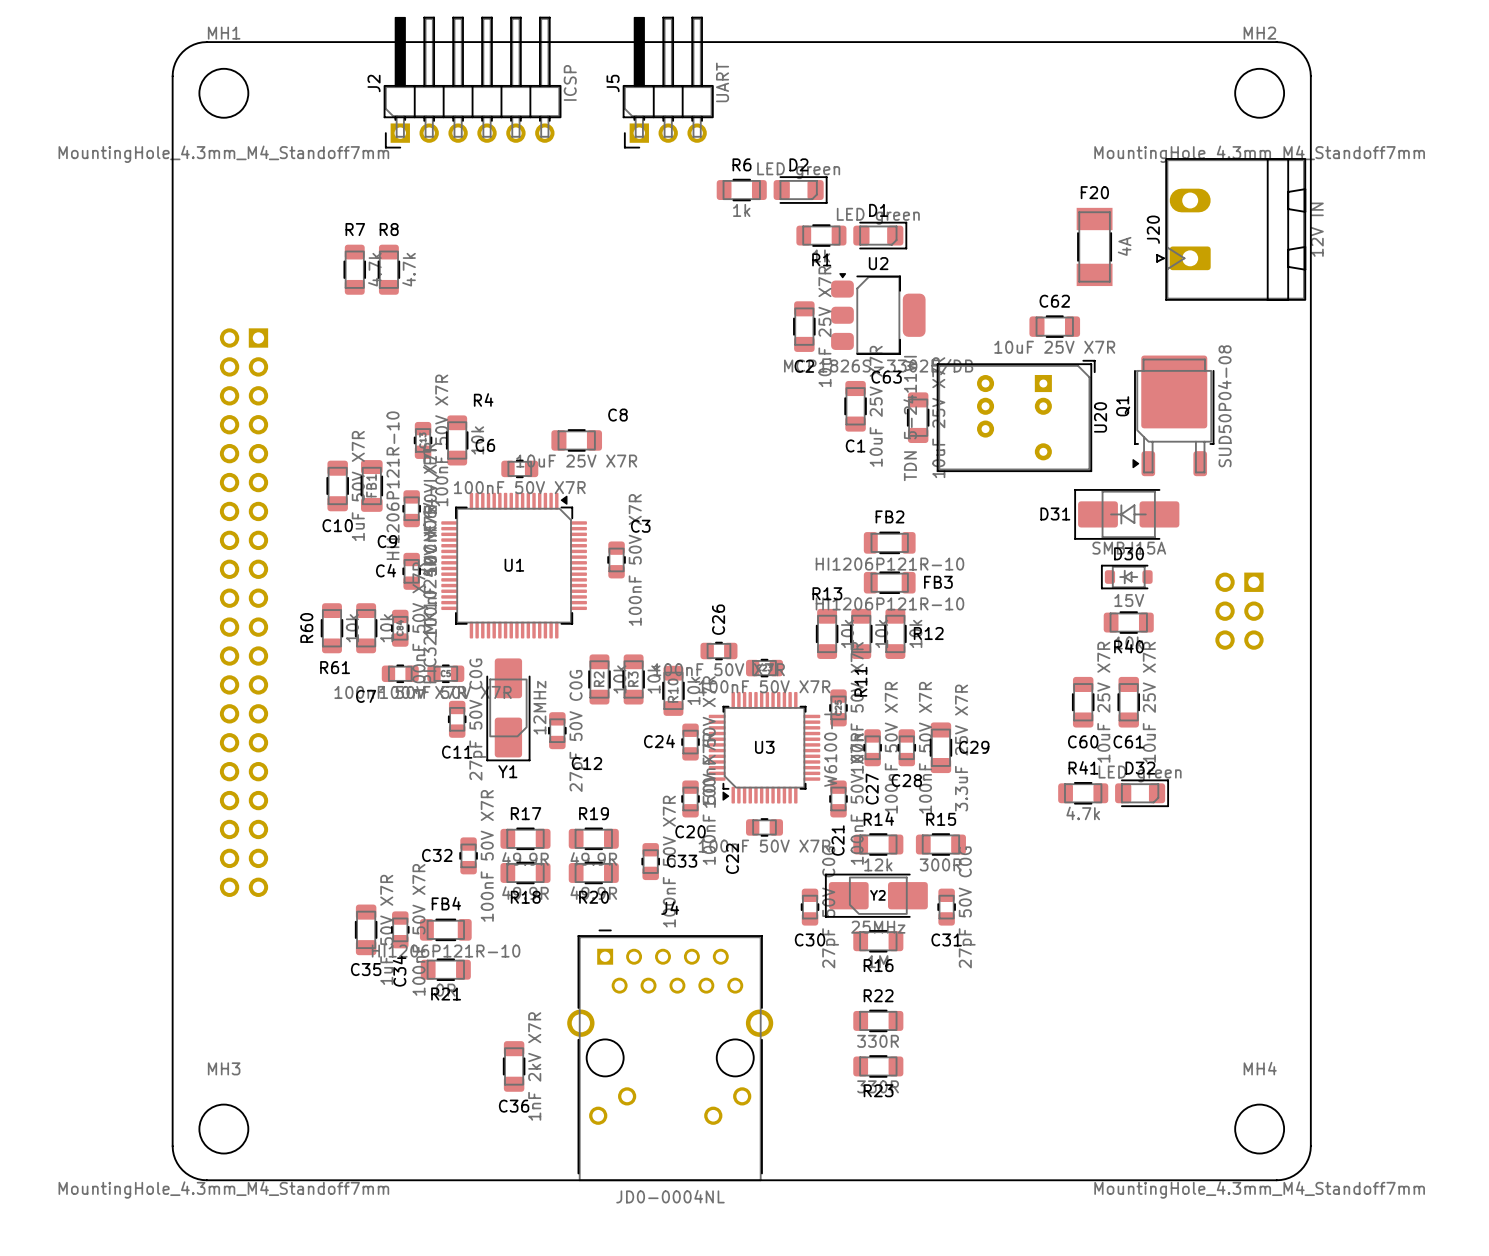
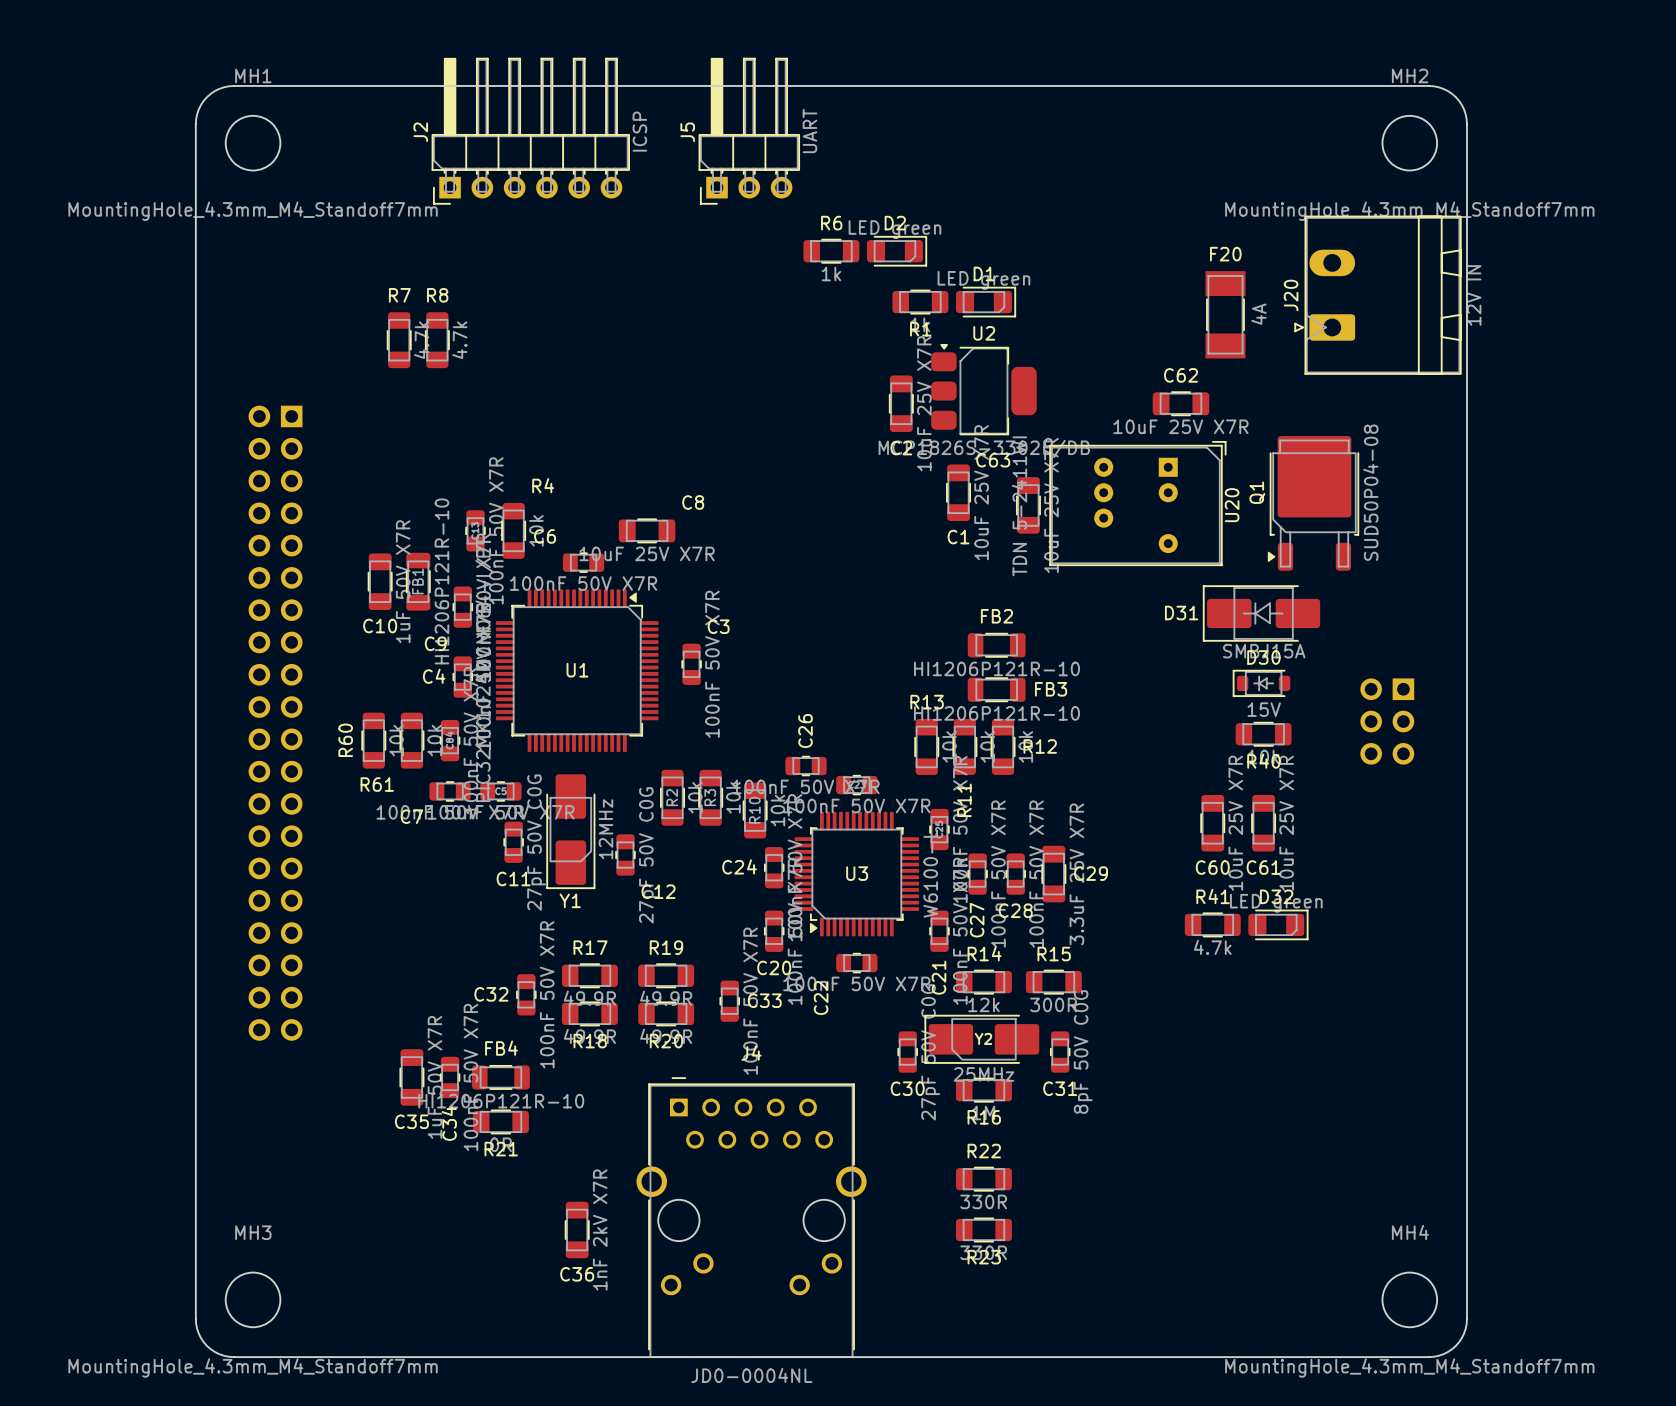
C31 value: 27pF 50V C0G (967, 907) -> 8pF 50V C0G (1083, 1052)

